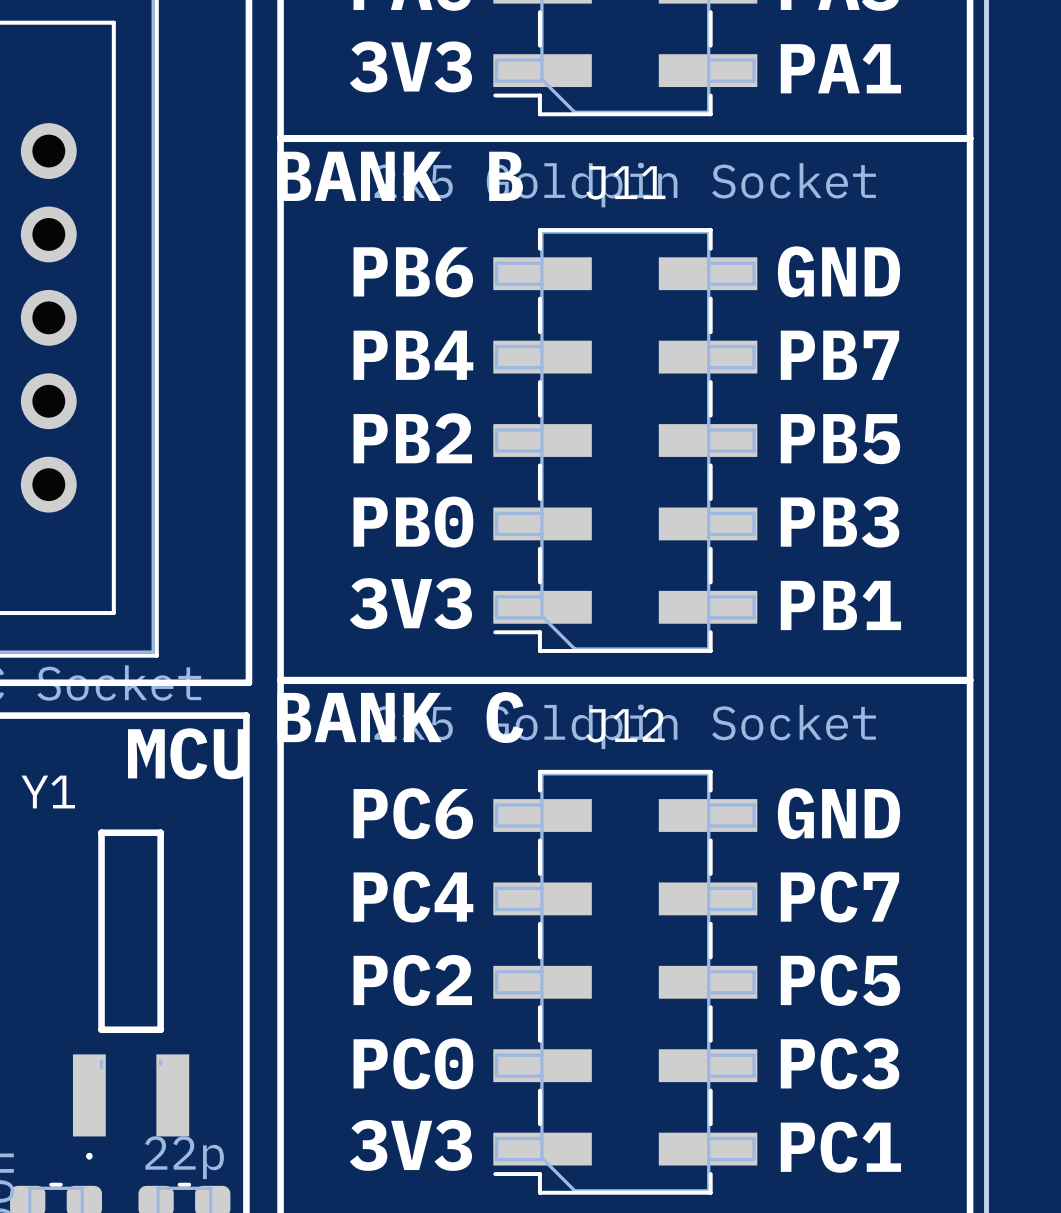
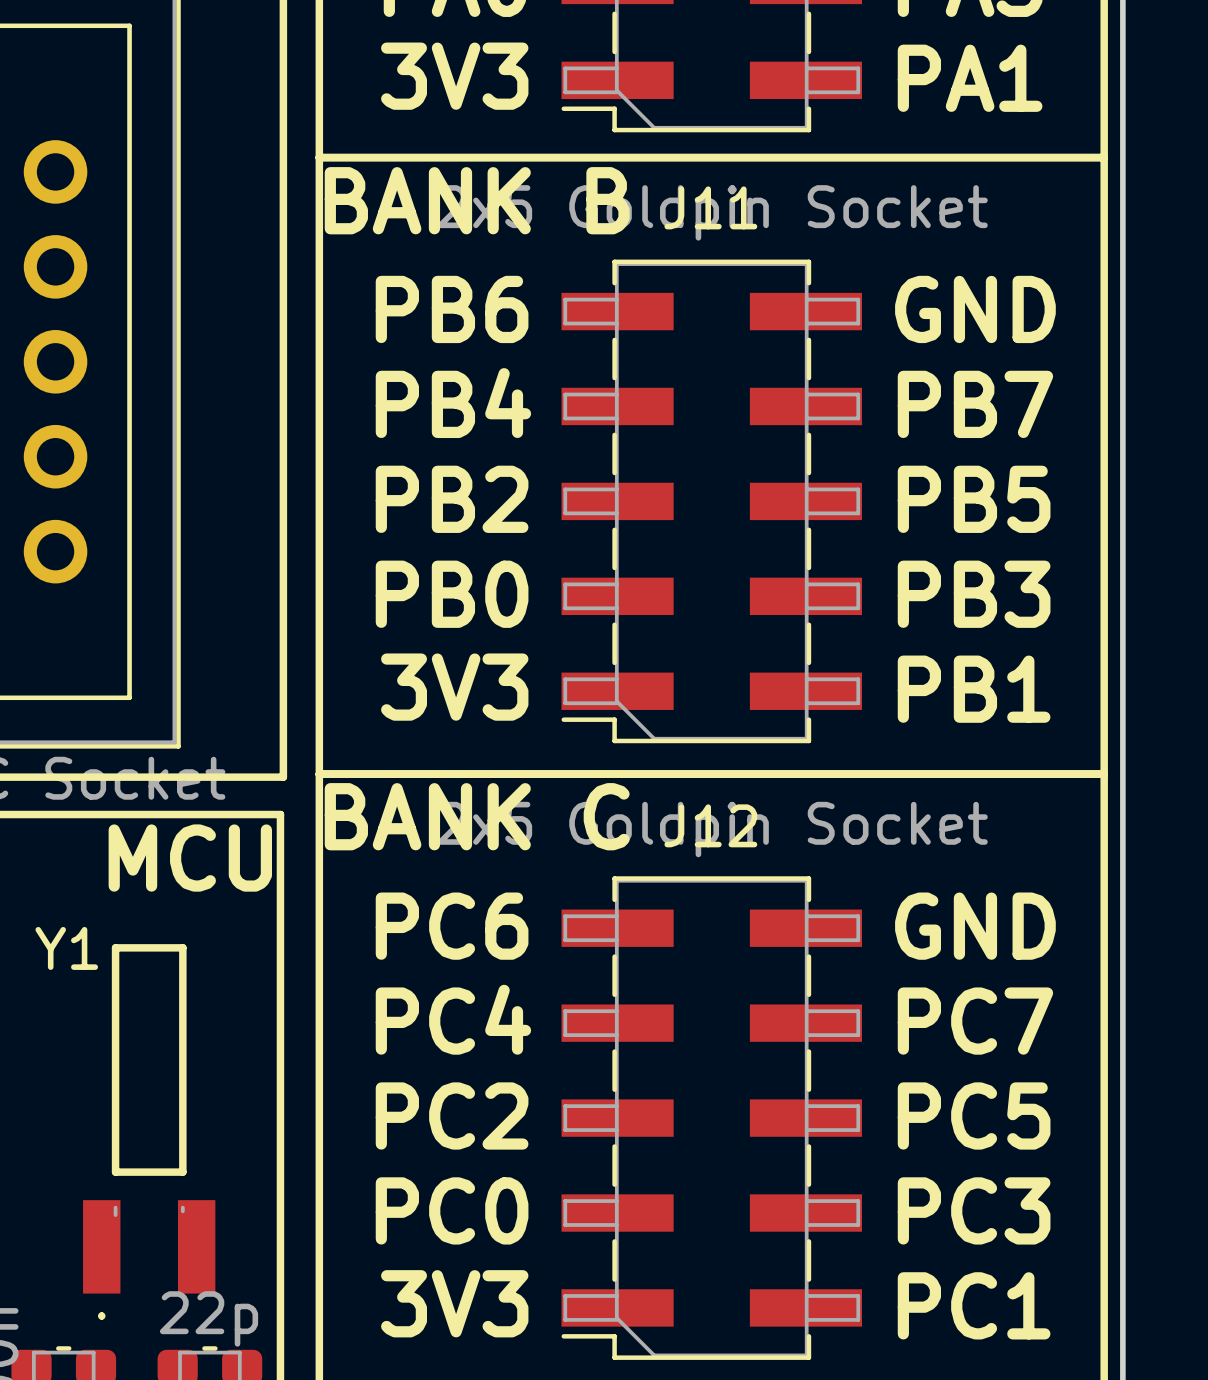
Y1 name position: Y1 (48, 792) -> Y1 (66, 948)

